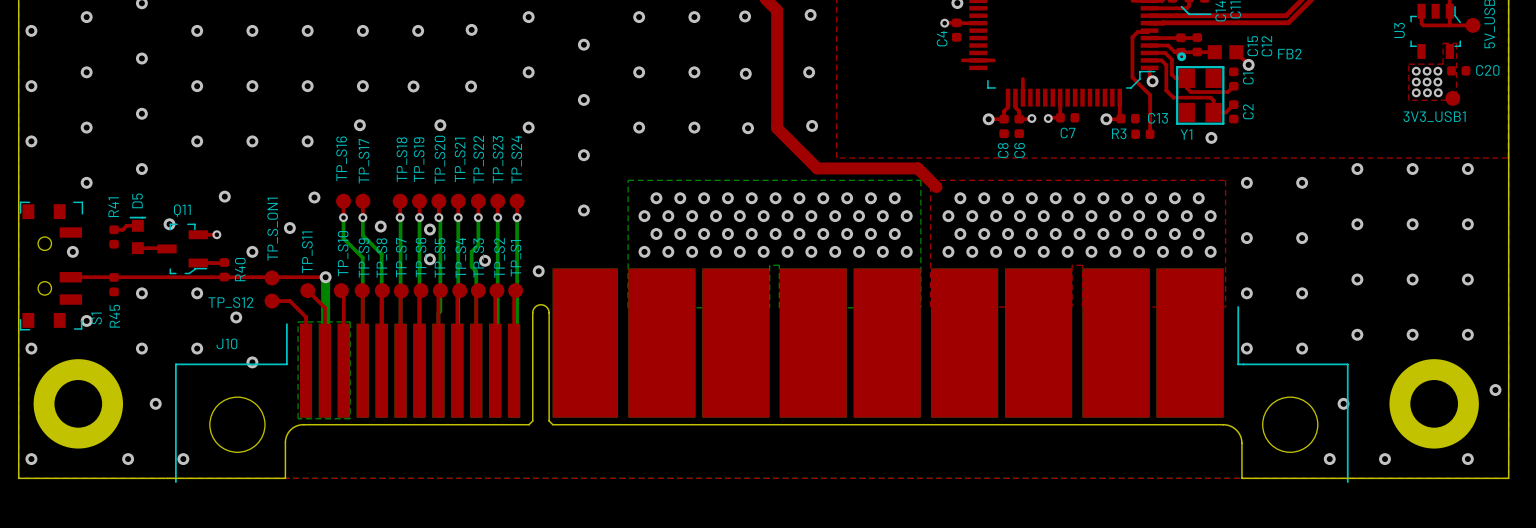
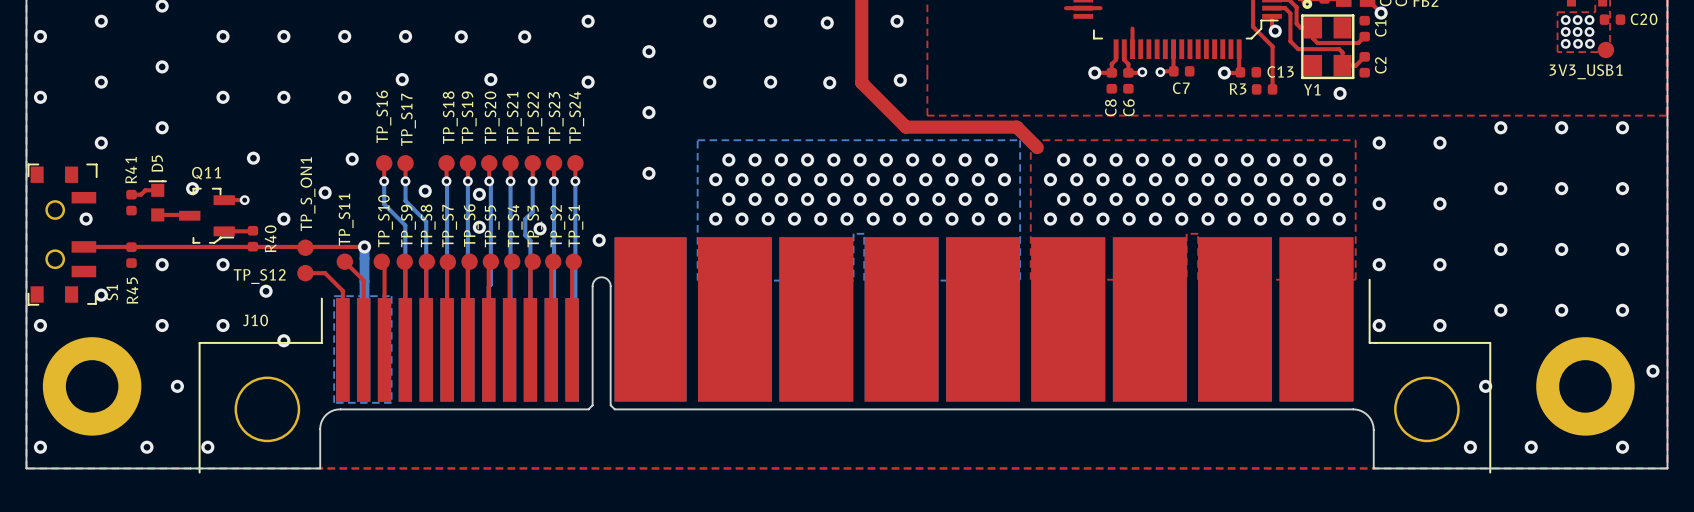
S1 footprint: [19, 201, 84, 331] -> [27, 163, 98, 306]
J10 footprint: [174, 268, 1349, 483] -> [198, 237, 1492, 474]

